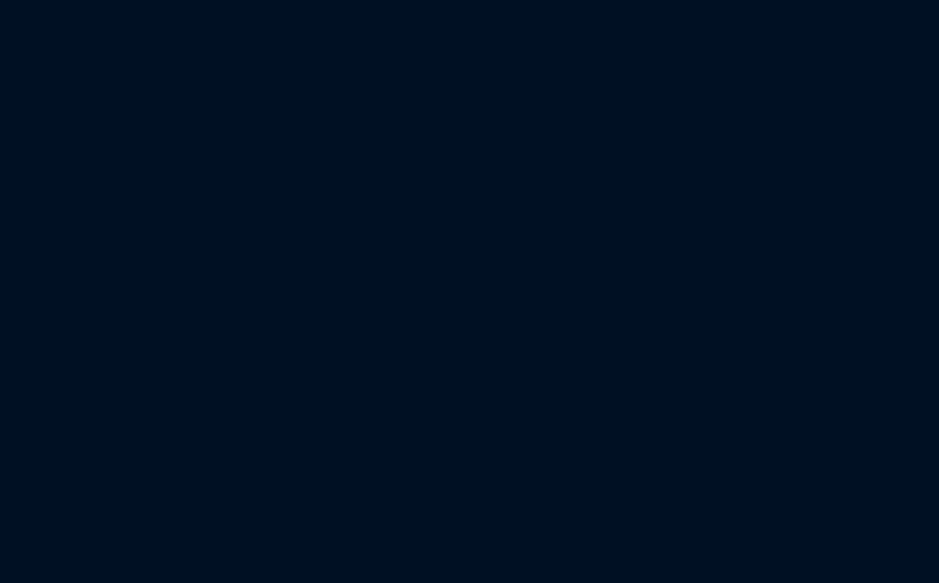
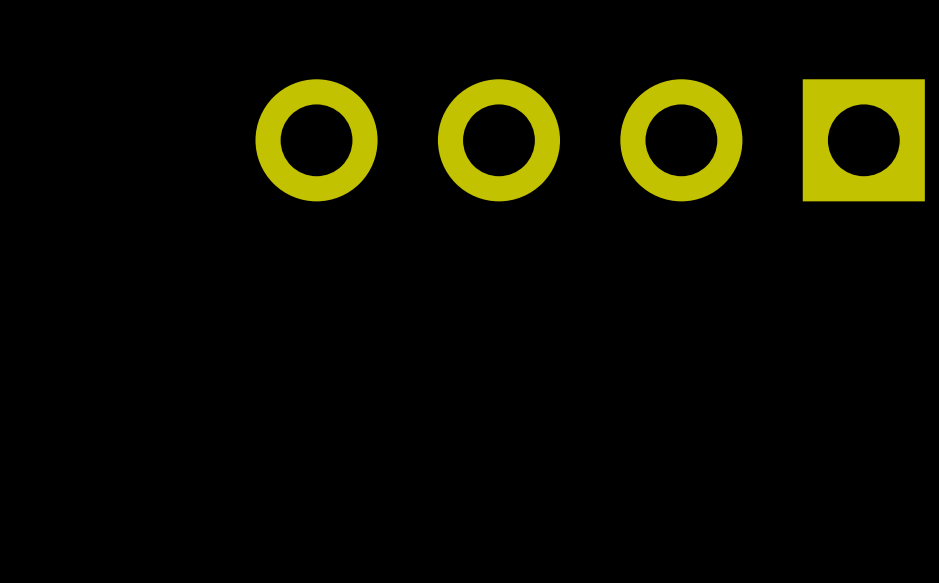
part: none -> (590, 140)

